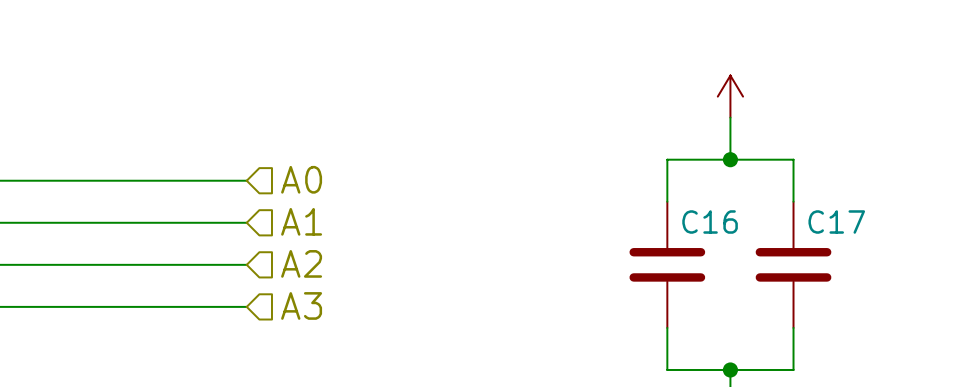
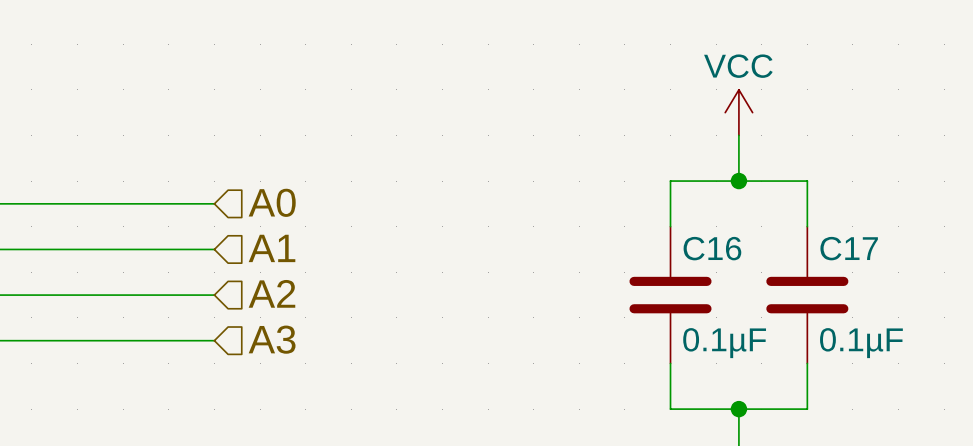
power symbol text: none -> VCC (738, 66)
C16 value: none -> 0.1µF (724, 343)
C17 value: none -> 0.1µF (861, 343)

